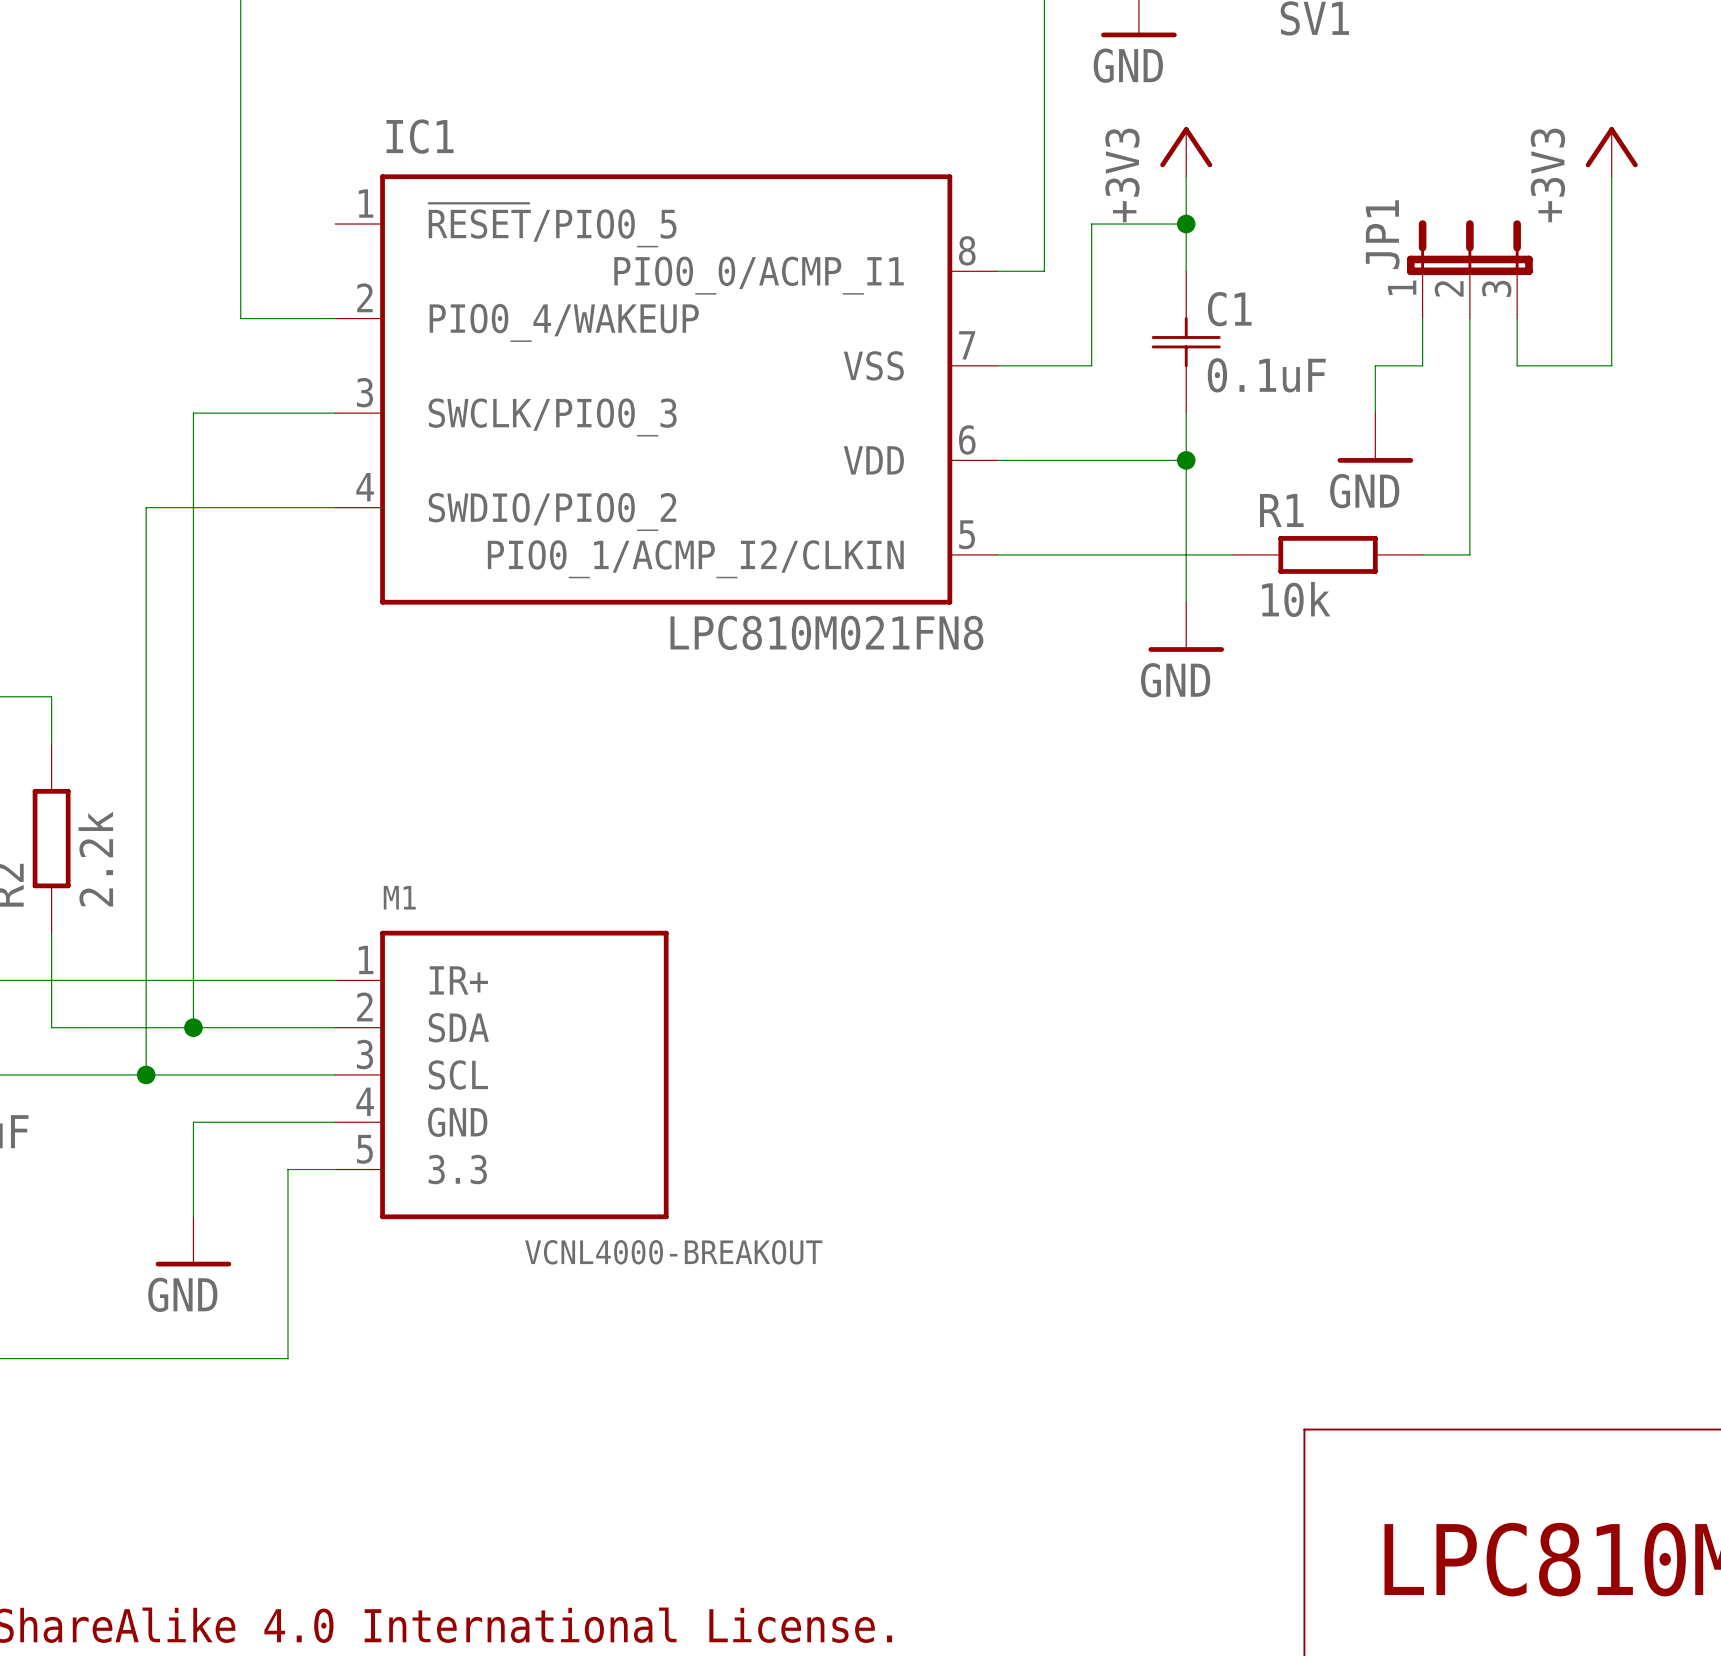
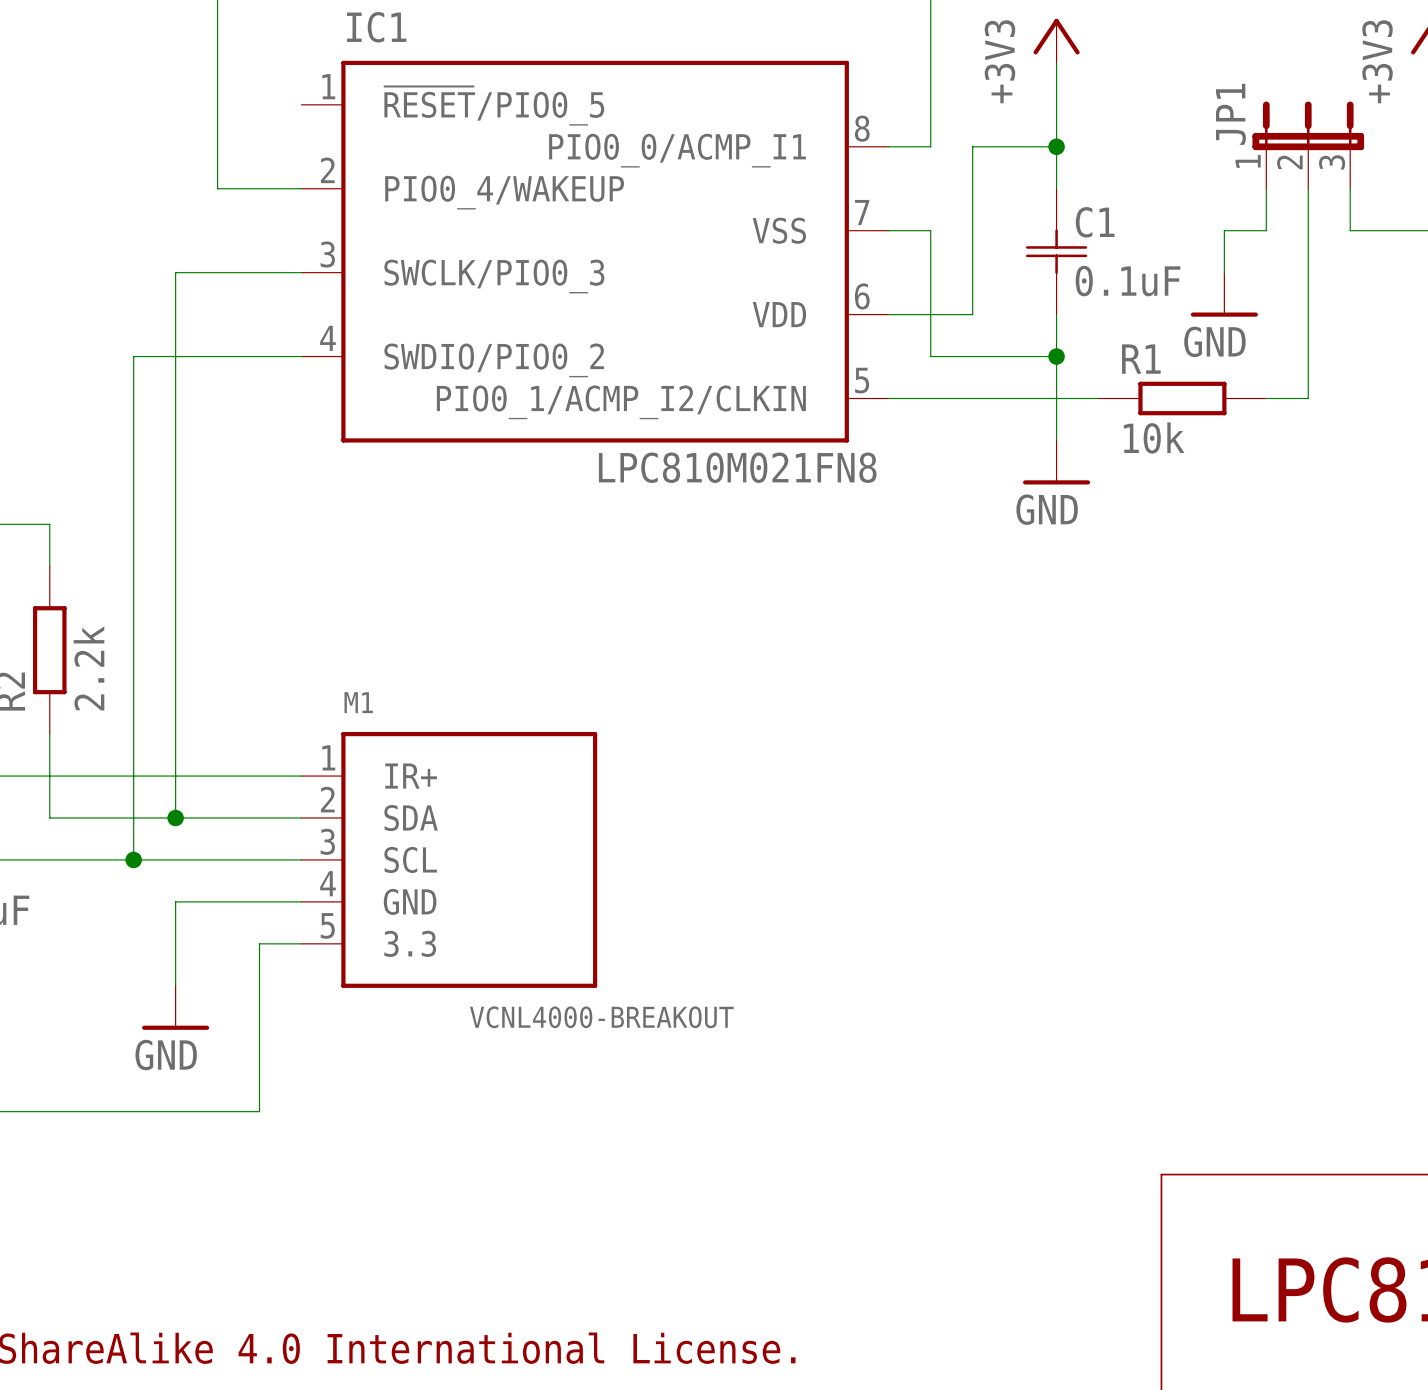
wire: (1186, 224) (1091, 224) (1091, 271) -> (1056, 188) (1056, 146) (972, 146)
junction position: (1186, 224) -> (1056, 146)
C1 position: (1186, 342) -> (1056, 251)
wire: (1044, 365) (1091, 365) -> (930, 230) (930, 356) (1056, 356)
wire: (1186, 413) (1186, 460) (1091, 460) -> (972, 230) (972, 314)
junction position: (1186, 460) -> (1056, 356)

